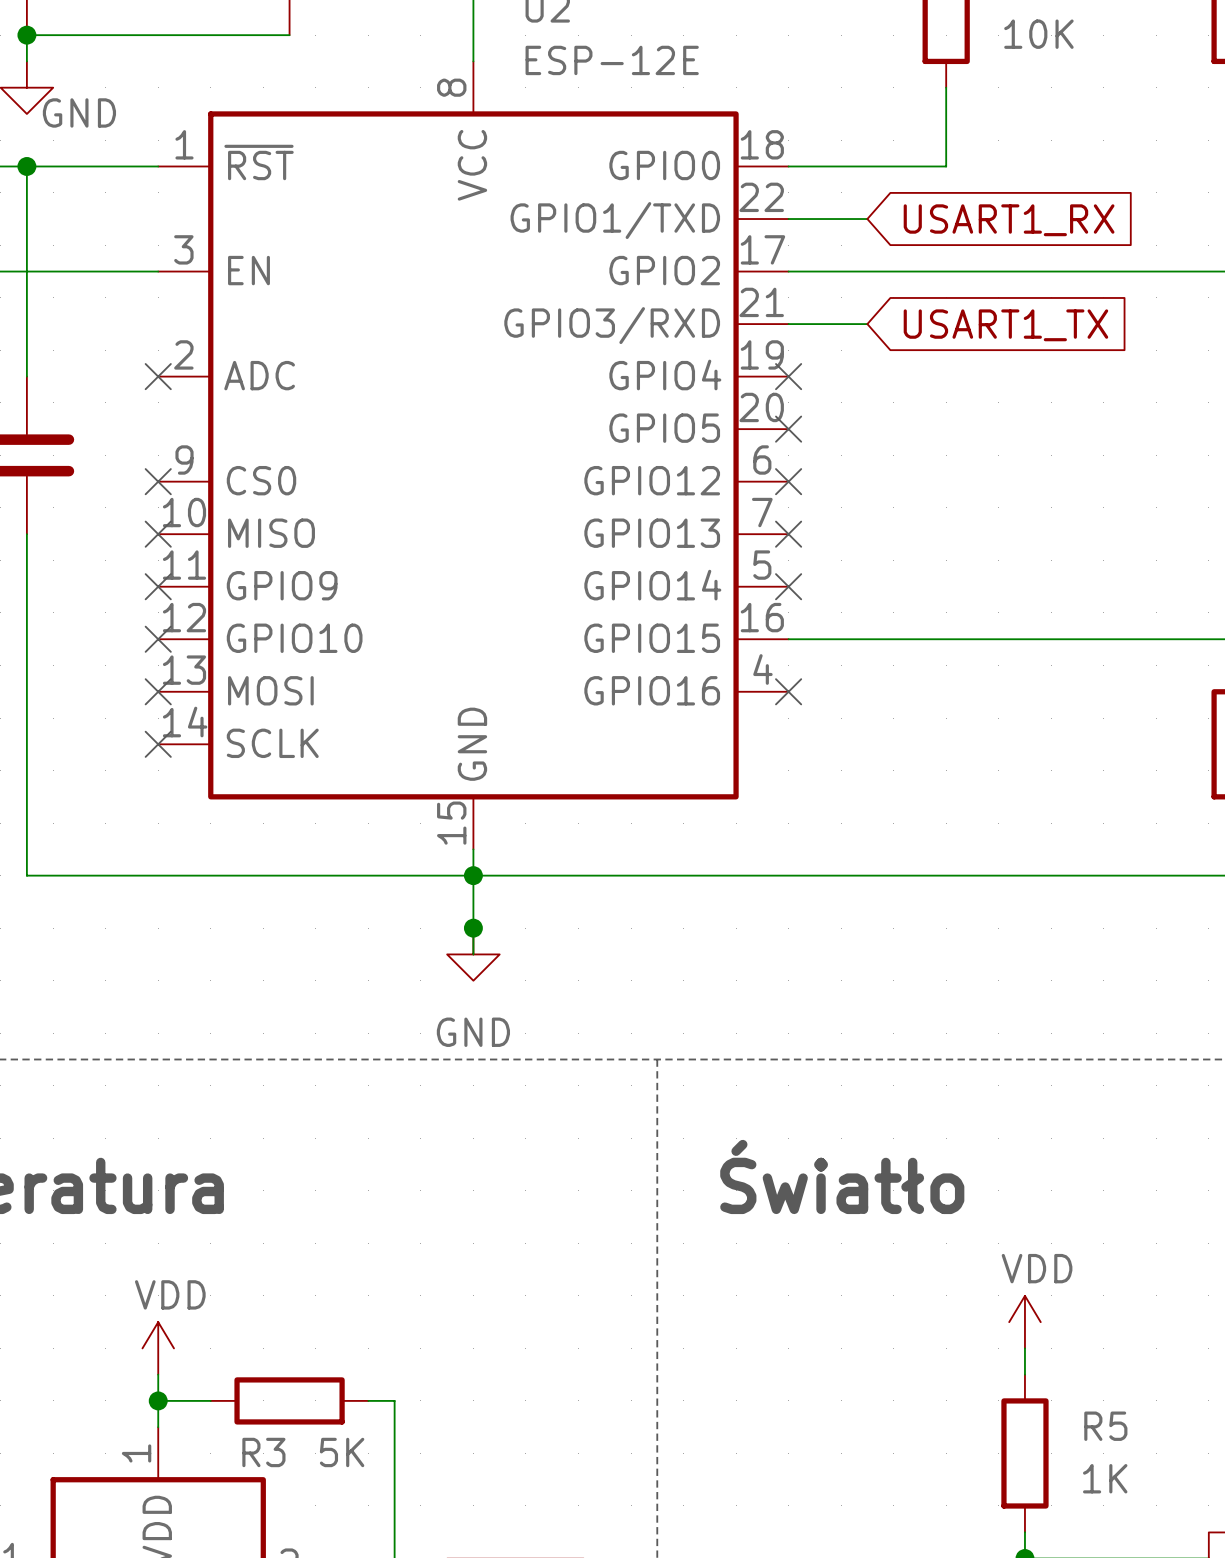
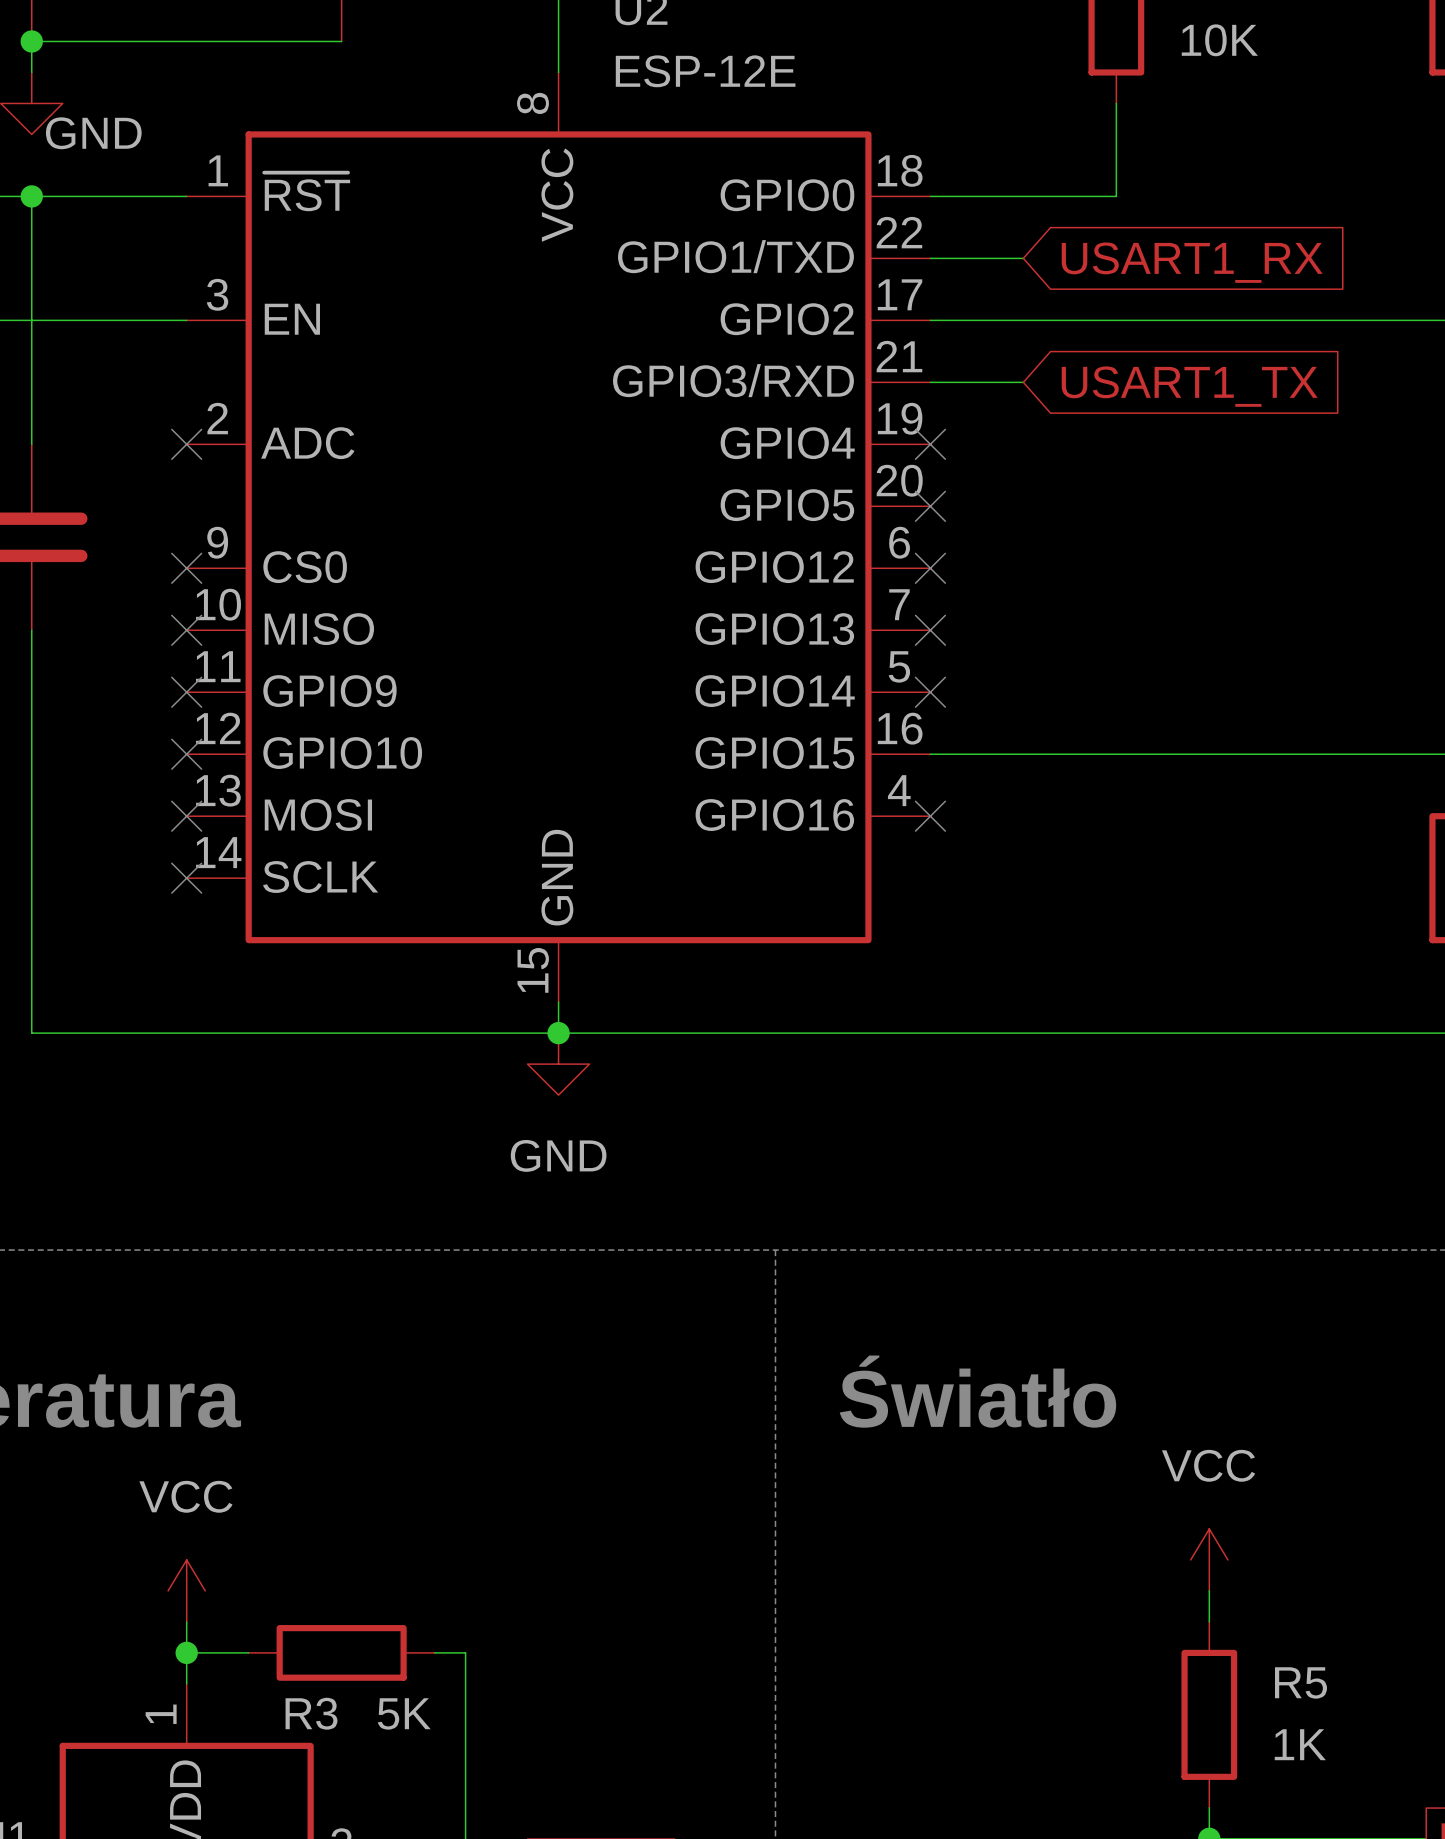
wire: (473, 875) (473, 954) -> none
junction: (473, 928) -> none
power symbol position: GND (473, 954) -> GND (558, 1064)
power symbol: VDD (1024, 1322) -> VCC (1209, 1559)
power symbol: VDD (158, 1348) -> VCC (186, 1590)

